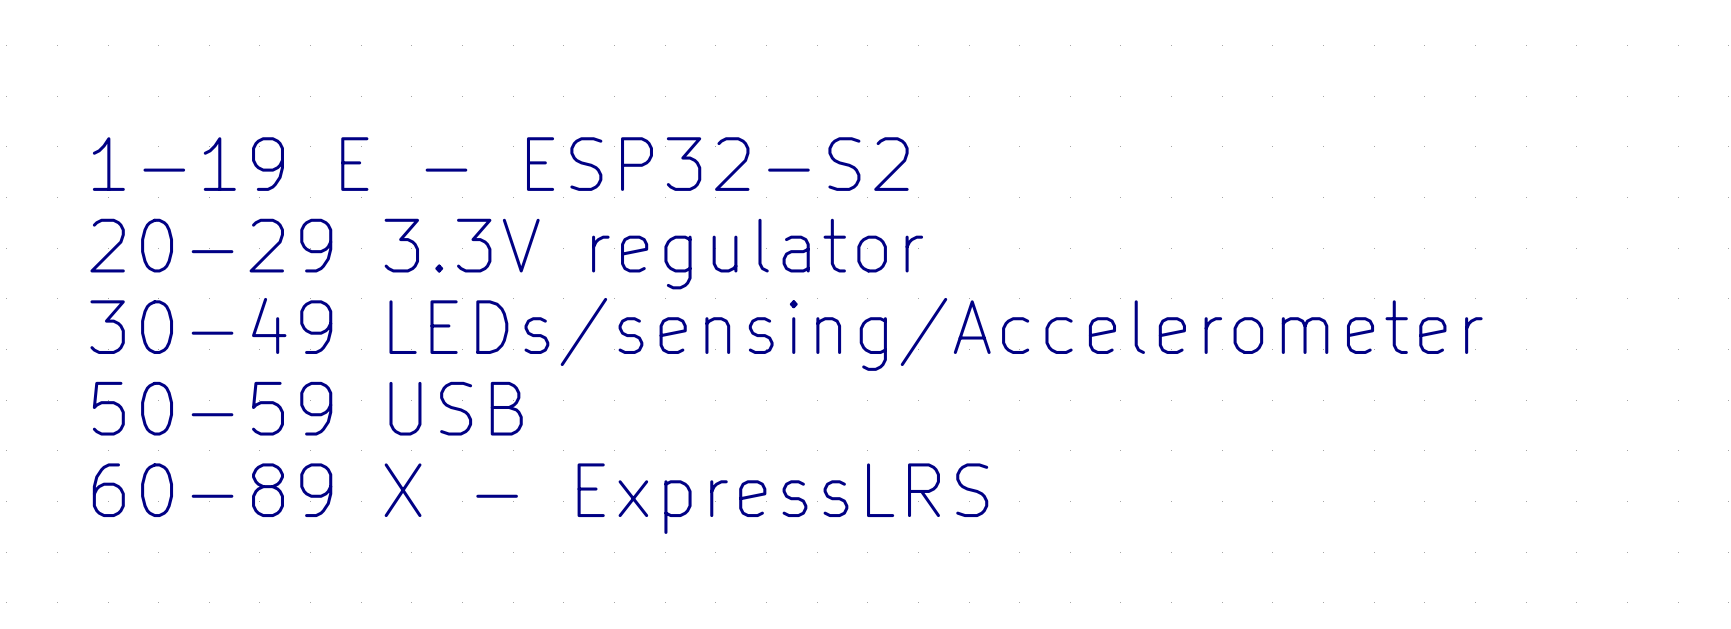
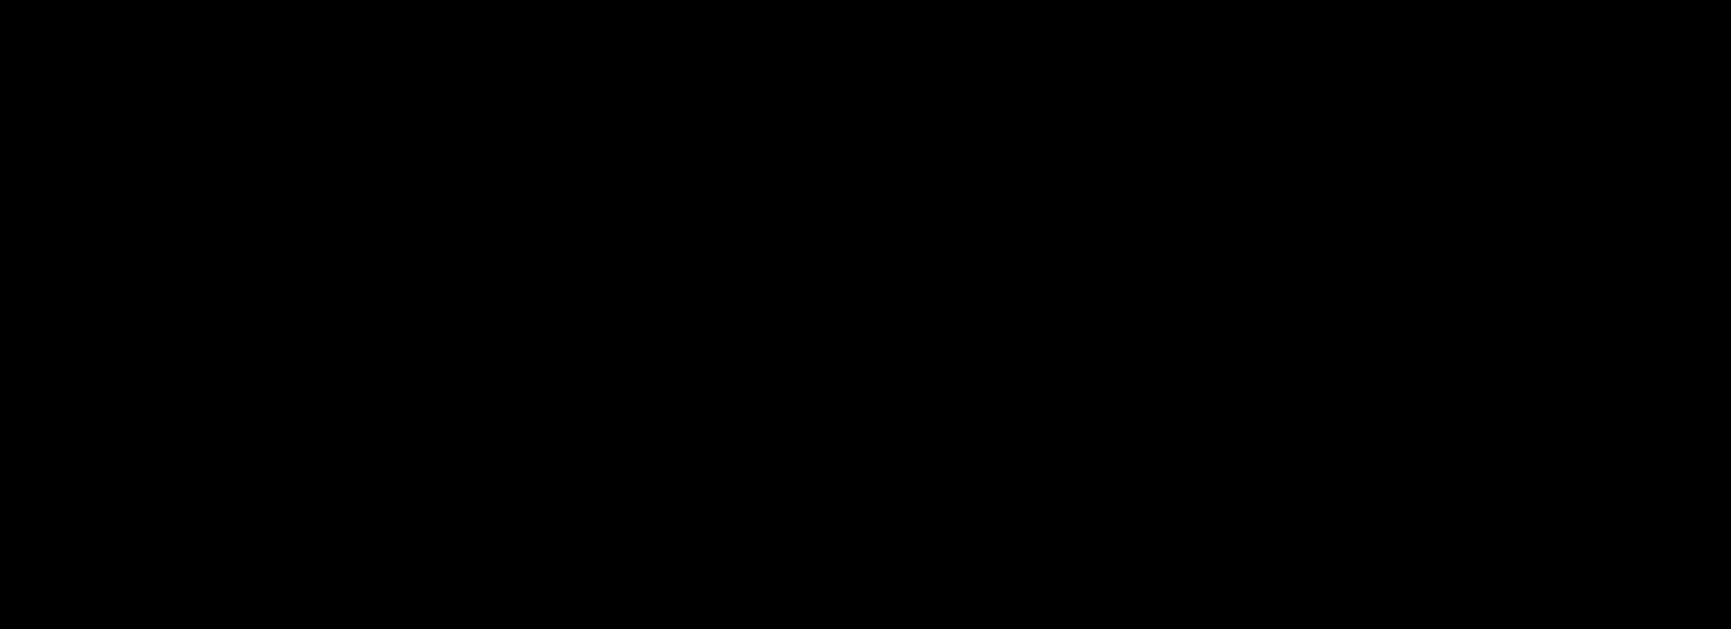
text: 1-19 E - ESP32-S2 (500, 164) -> none
text: 20-29 3.3V regulator (506, 254) -> none
text: 30-49 LEDs/sensing/Accelerometer (786, 334) -> none
text: 50-59 USB (307, 408) -> none
text: 60-89 X - ExpressLRS (540, 498) -> none

